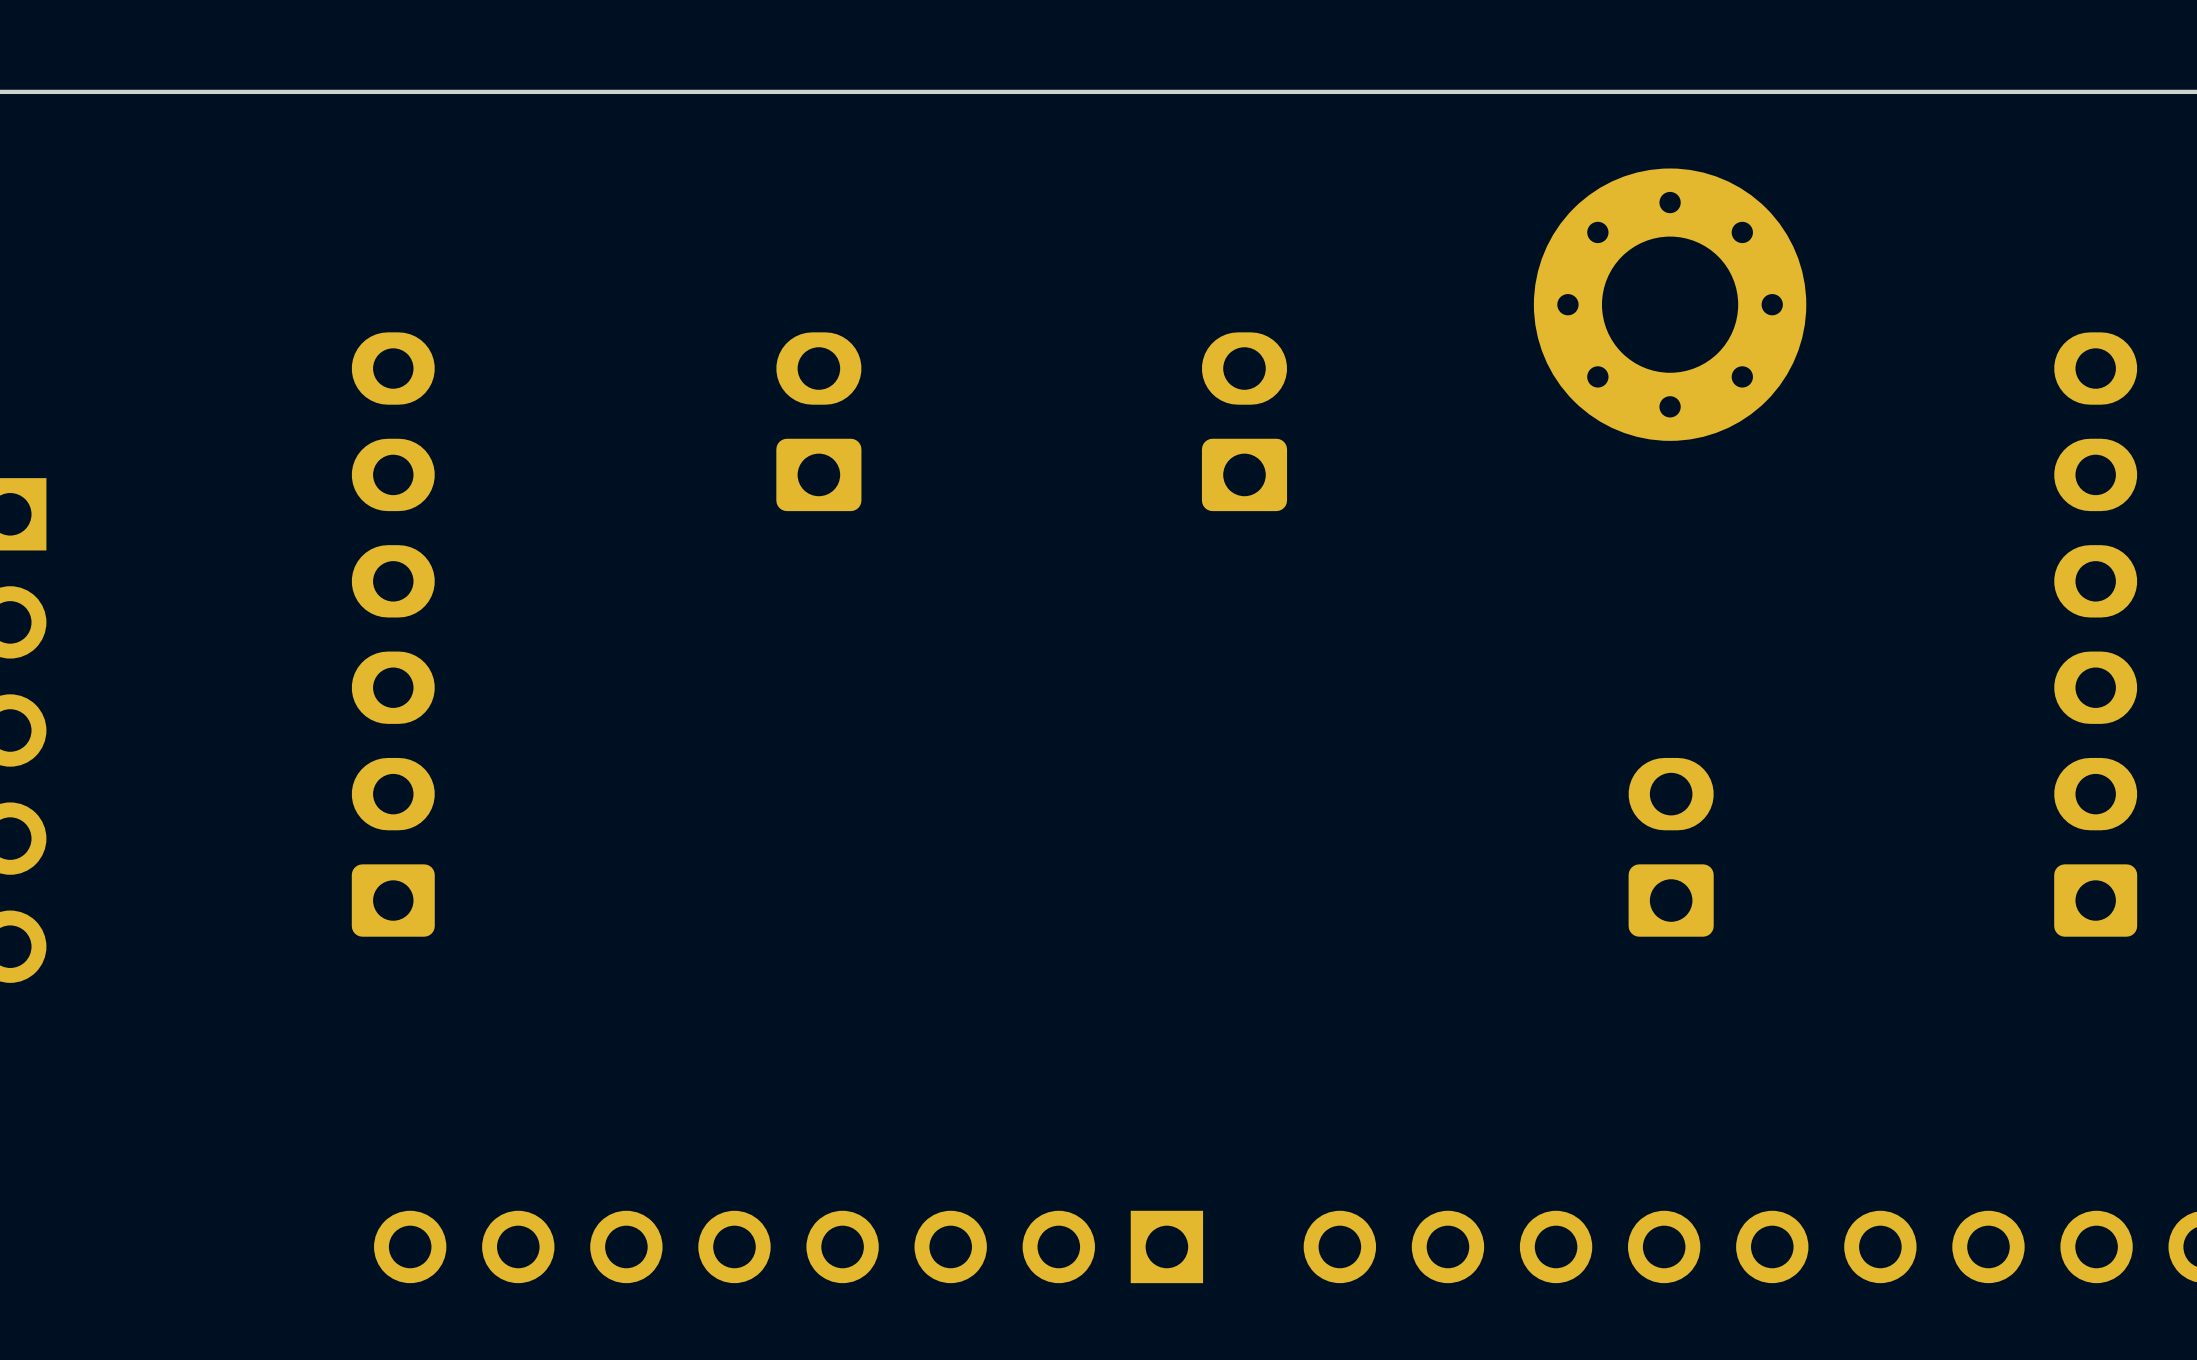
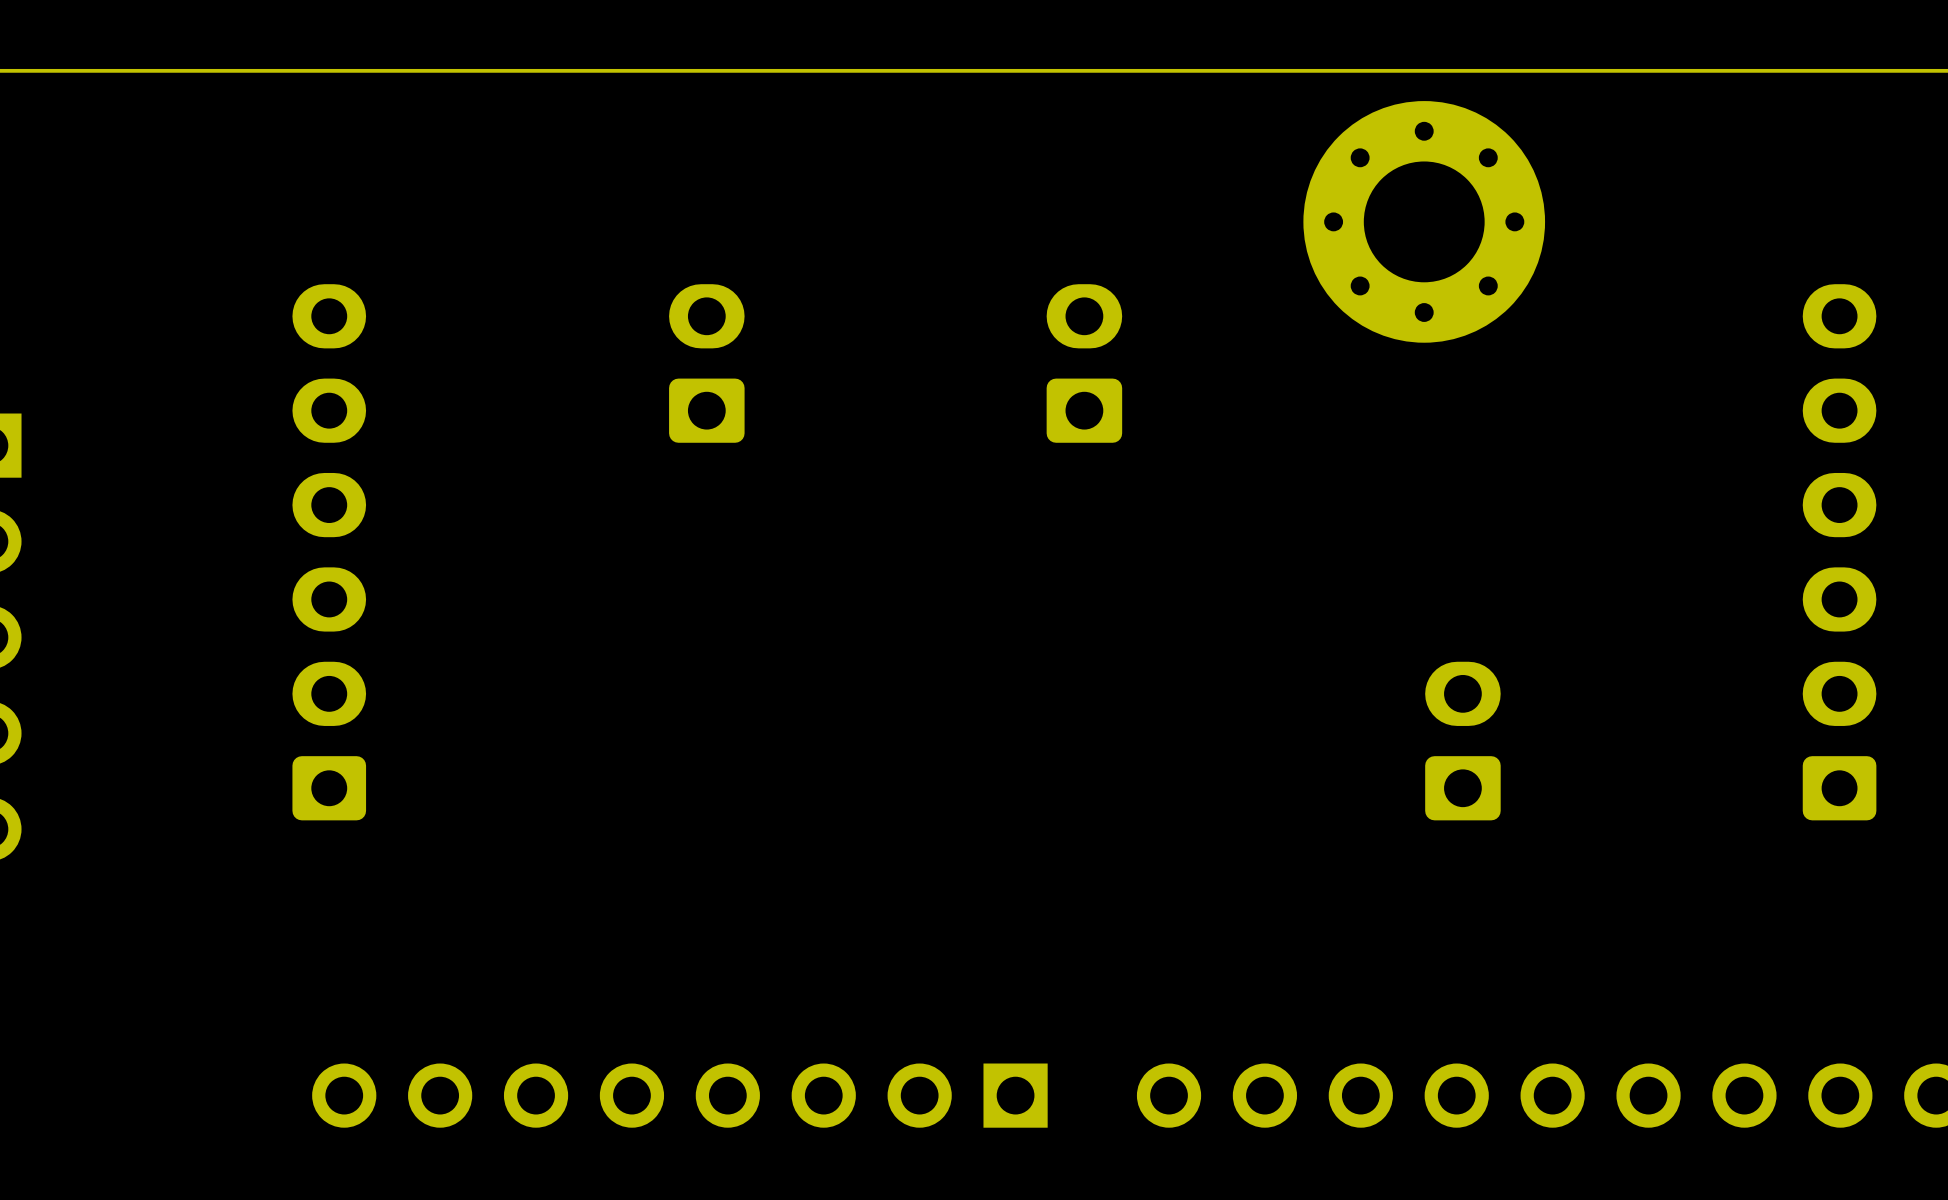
part position: (1670, 304) -> (1424, 221)

